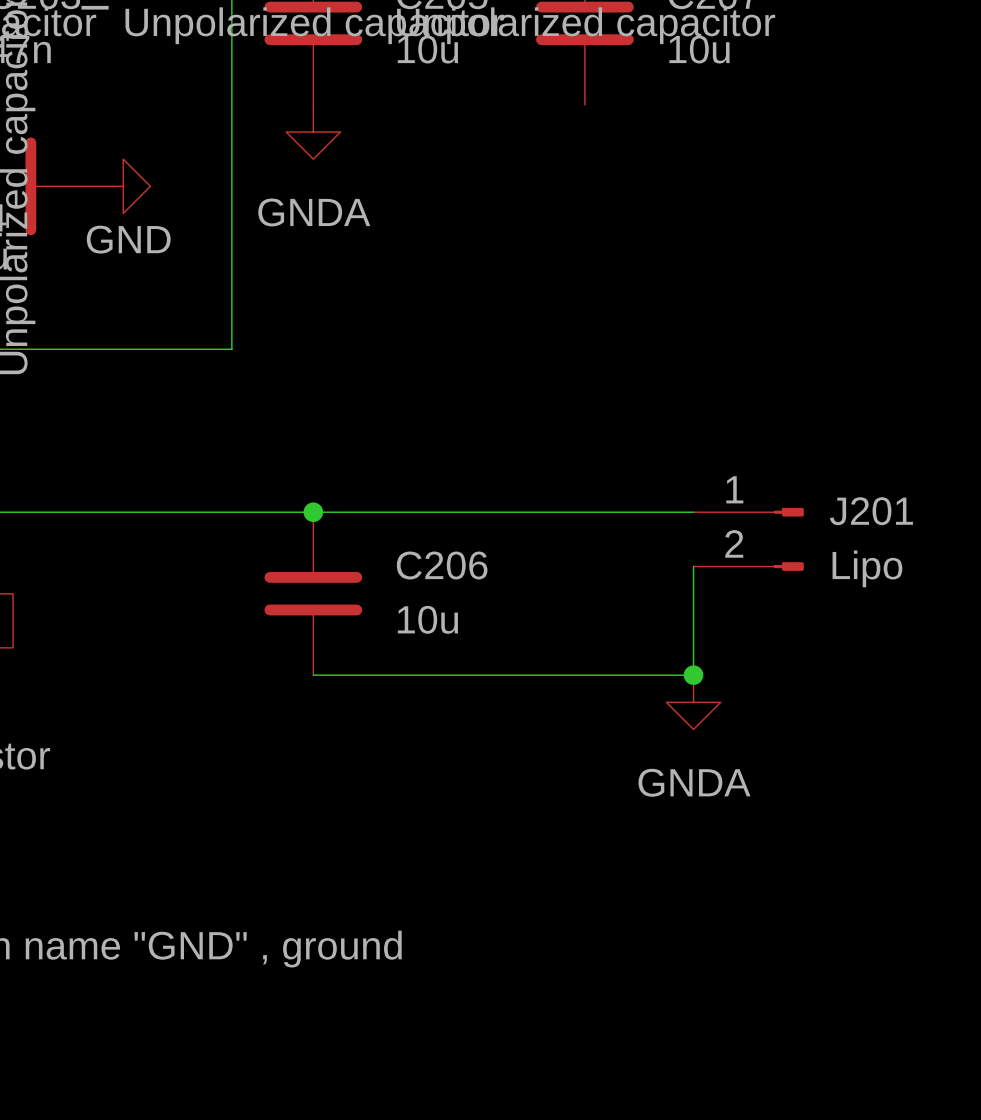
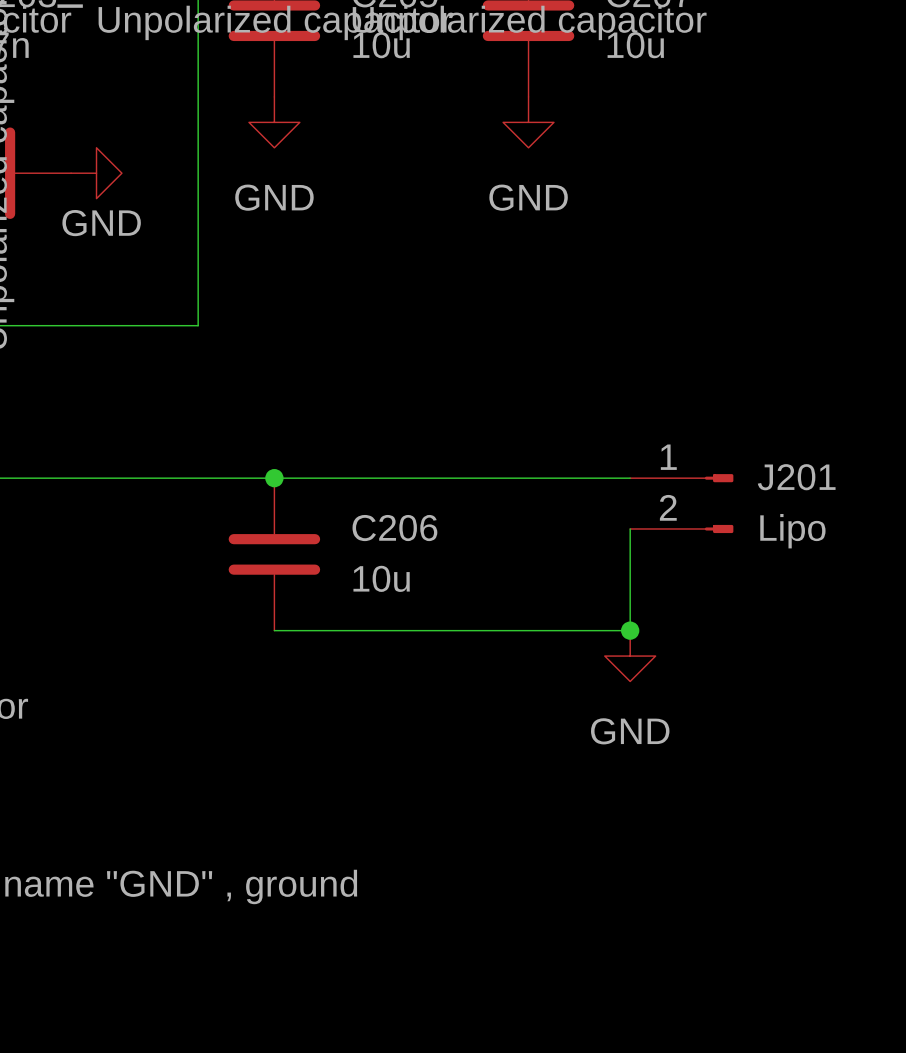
power symbol: GNDA (313, 132) -> GND (274, 122)
power symbol: none -> GND (528, 122)
power symbol: GNDA (693, 702) -> GND (630, 656)

